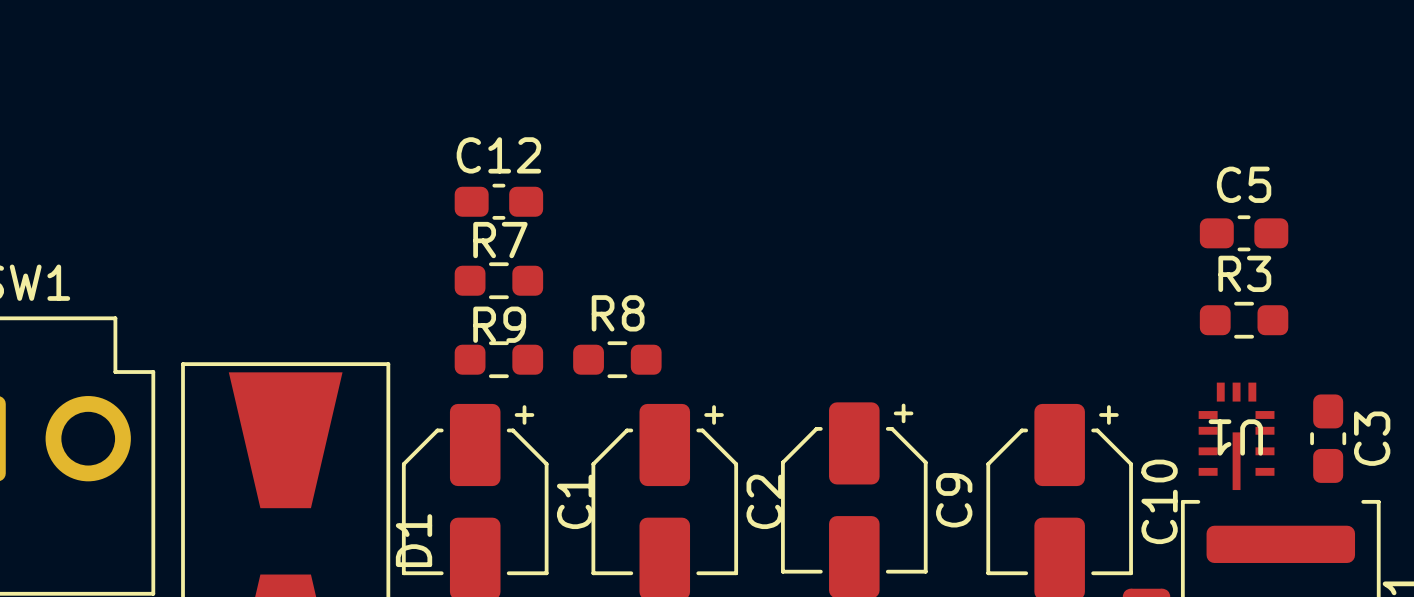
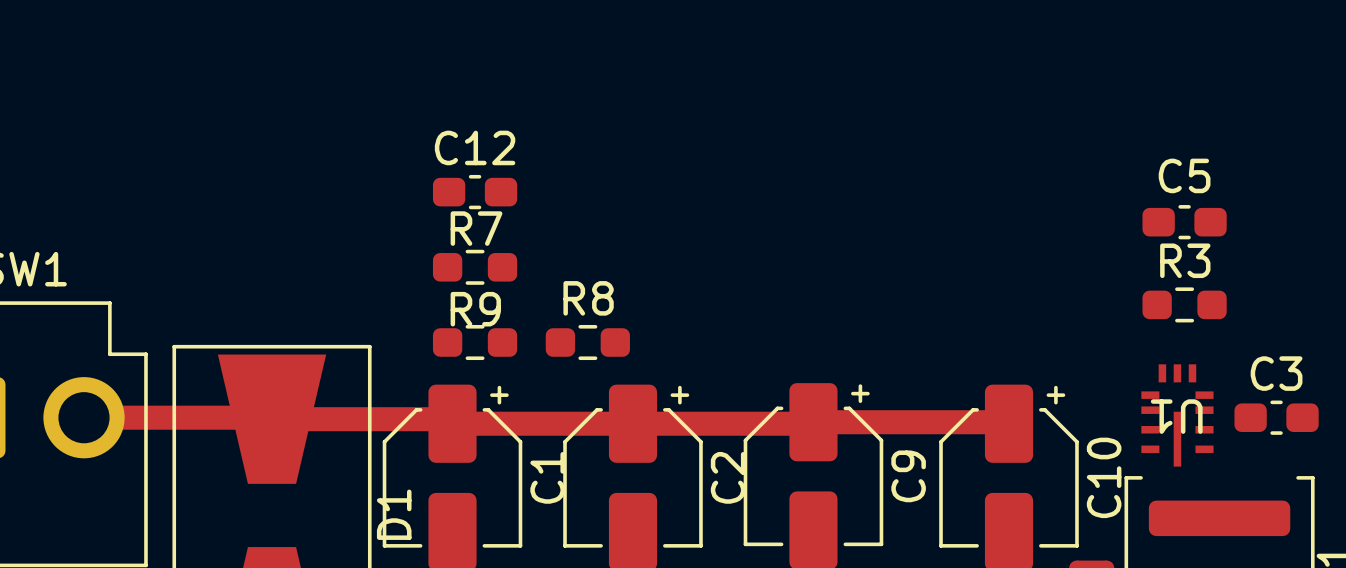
top track: none -> (84, 417) (447, 419) (452, 423) (813, 422) (1008, 423)
C3 rotation: 0° (1328, 438) -> 90° clockwise (1276, 417)
C3 name position: C3 (1372, 438) -> C3 (1276, 373)

